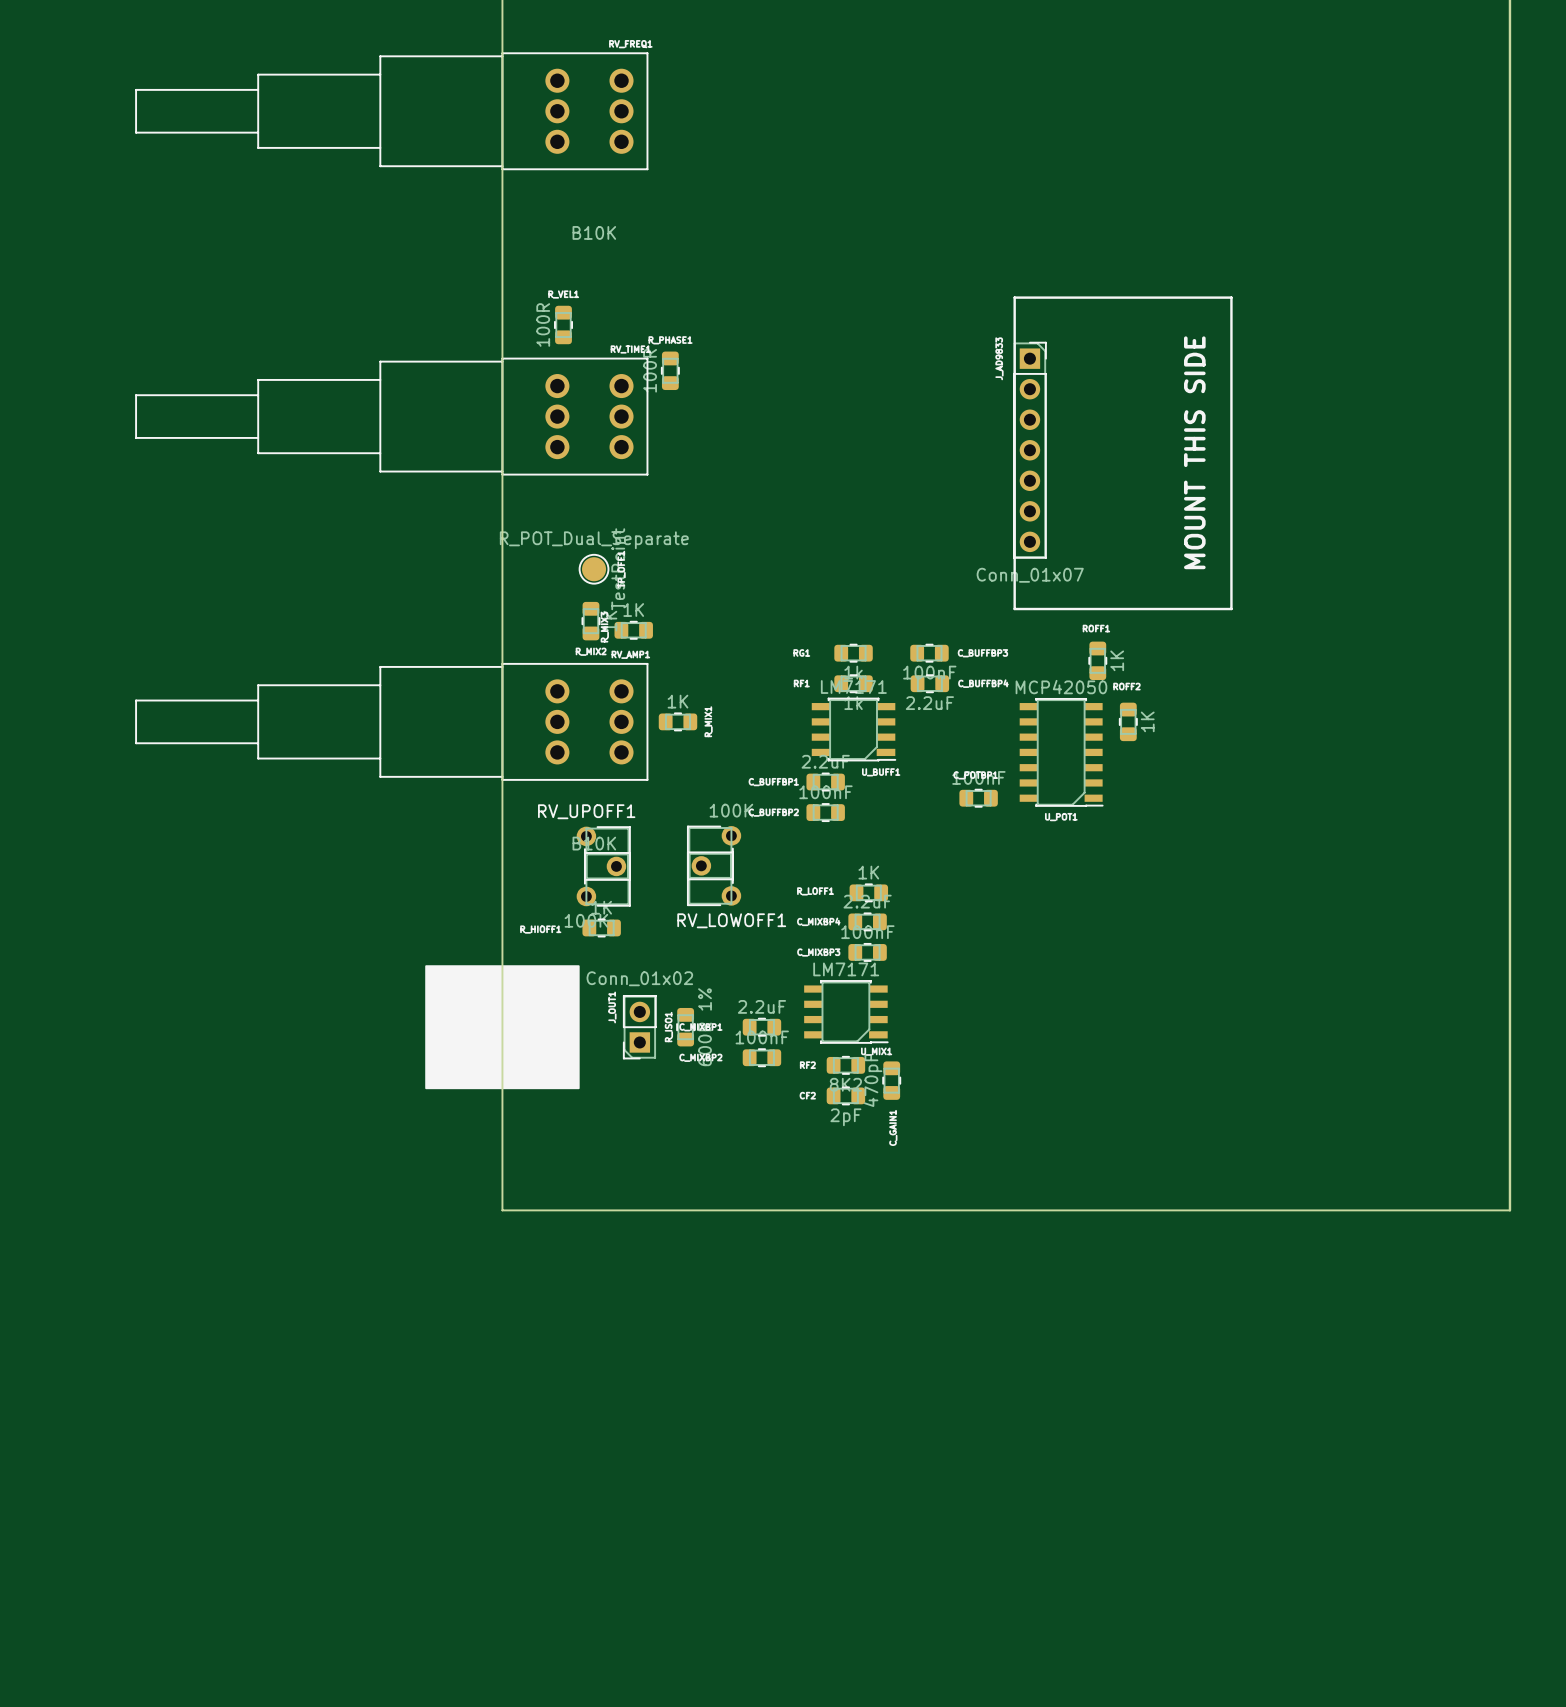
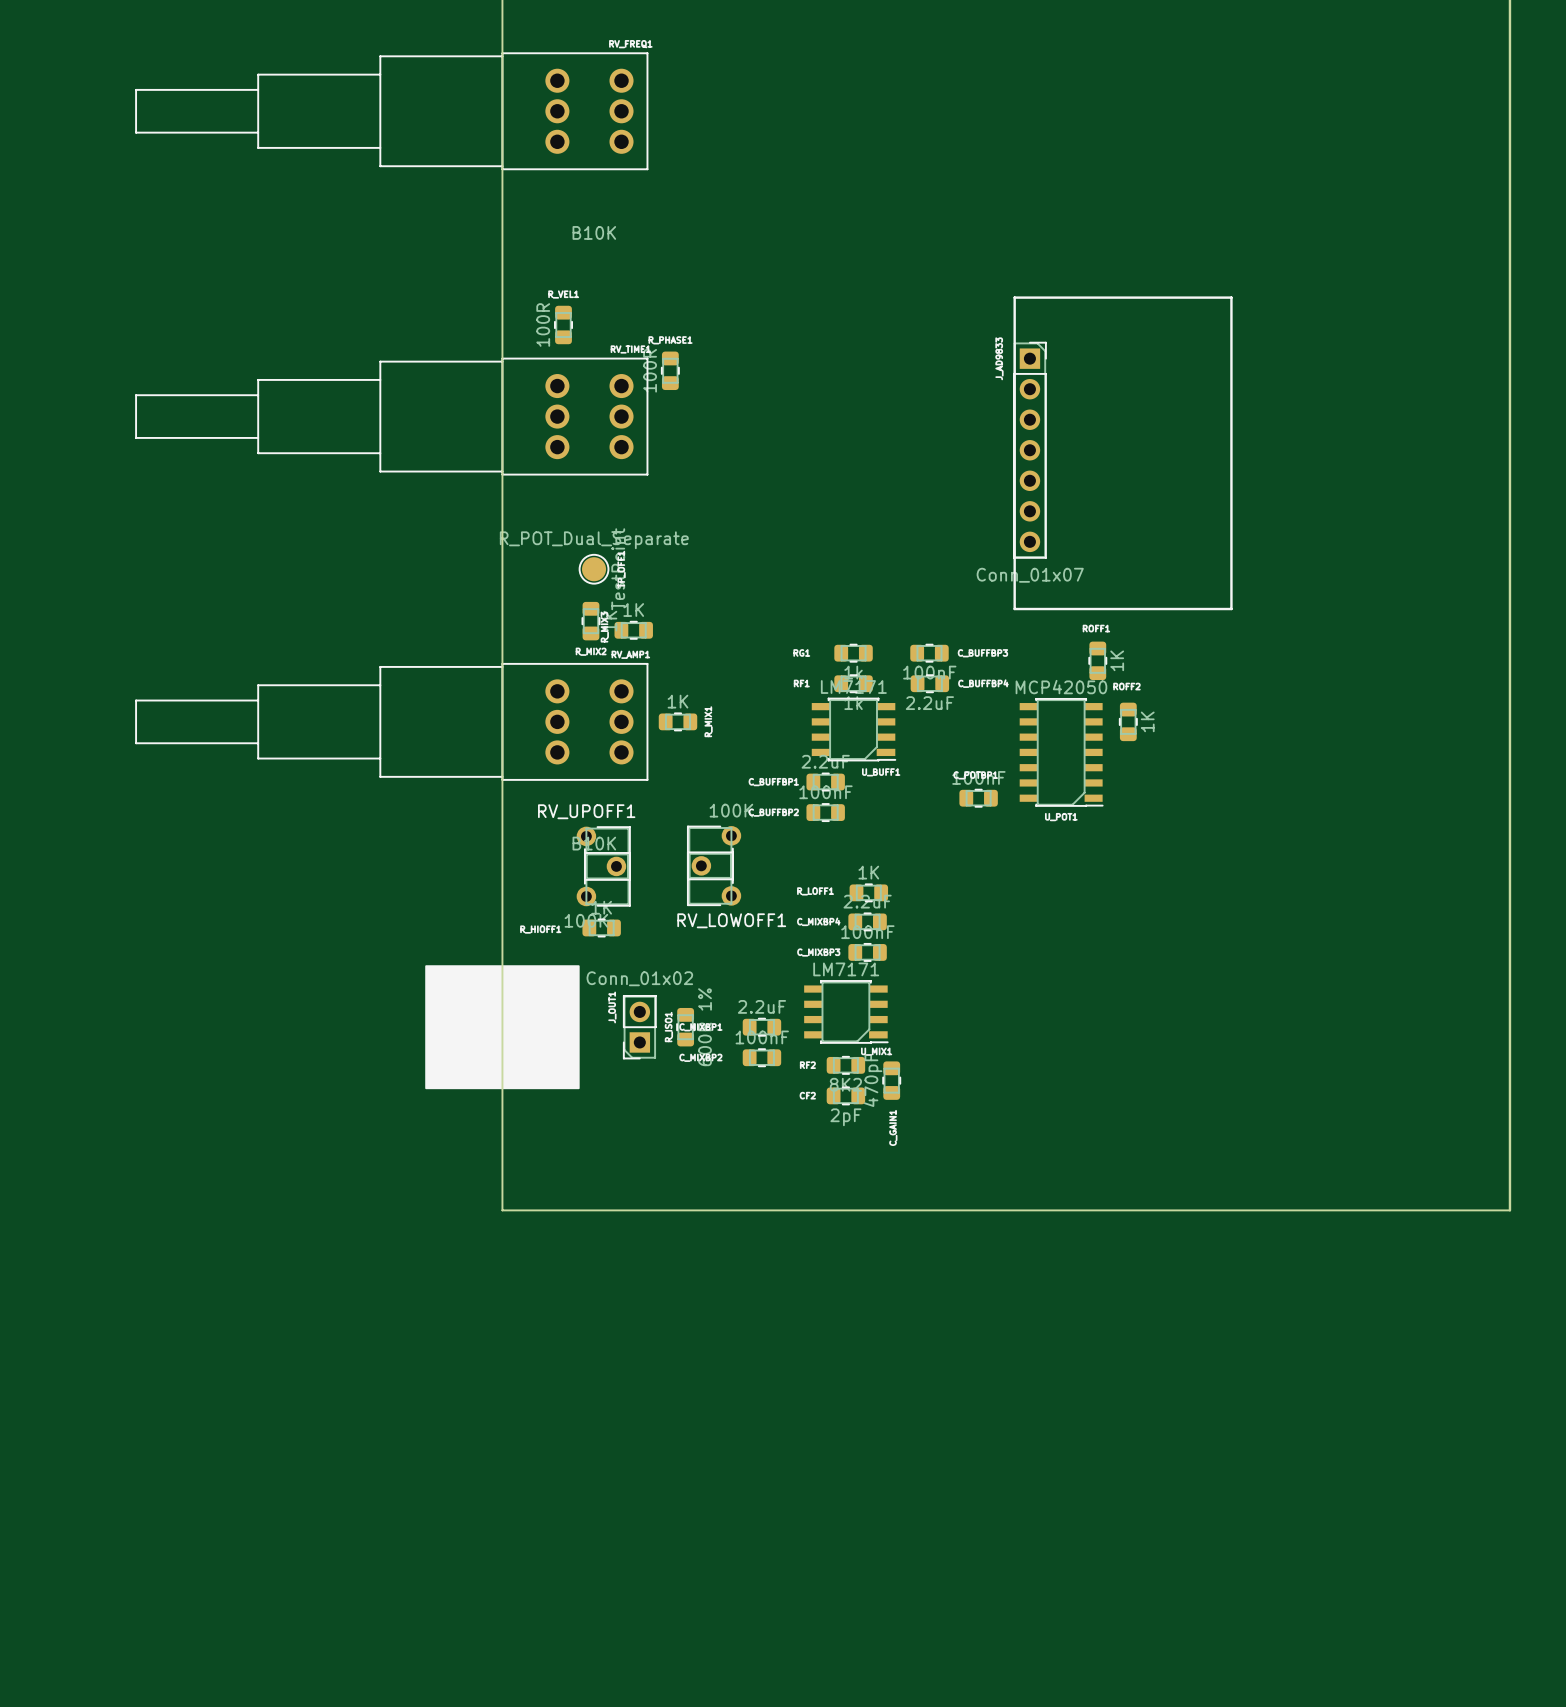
text: MOUNT THIS SIDE (1194, 452) -> none

